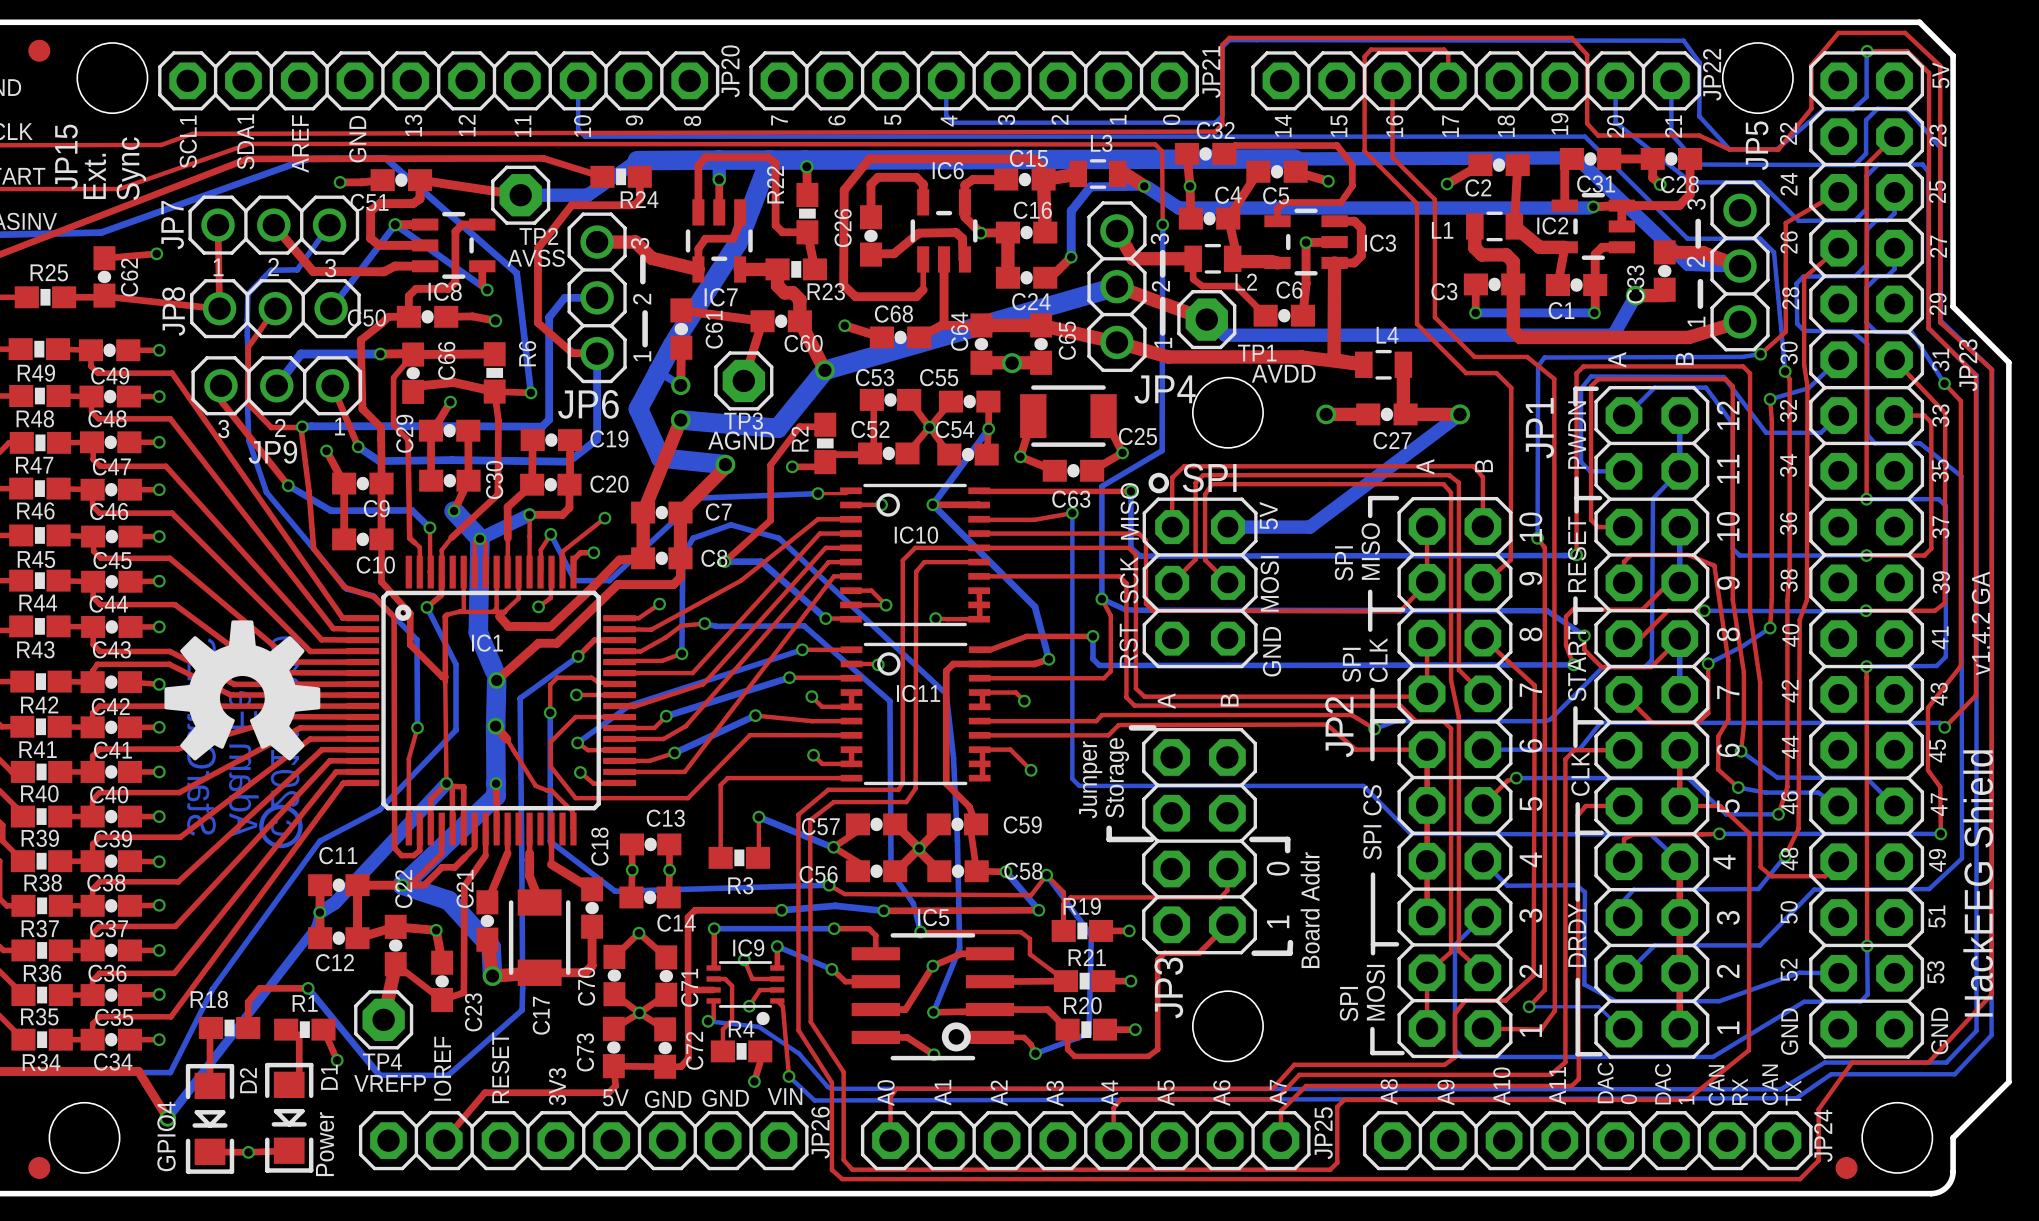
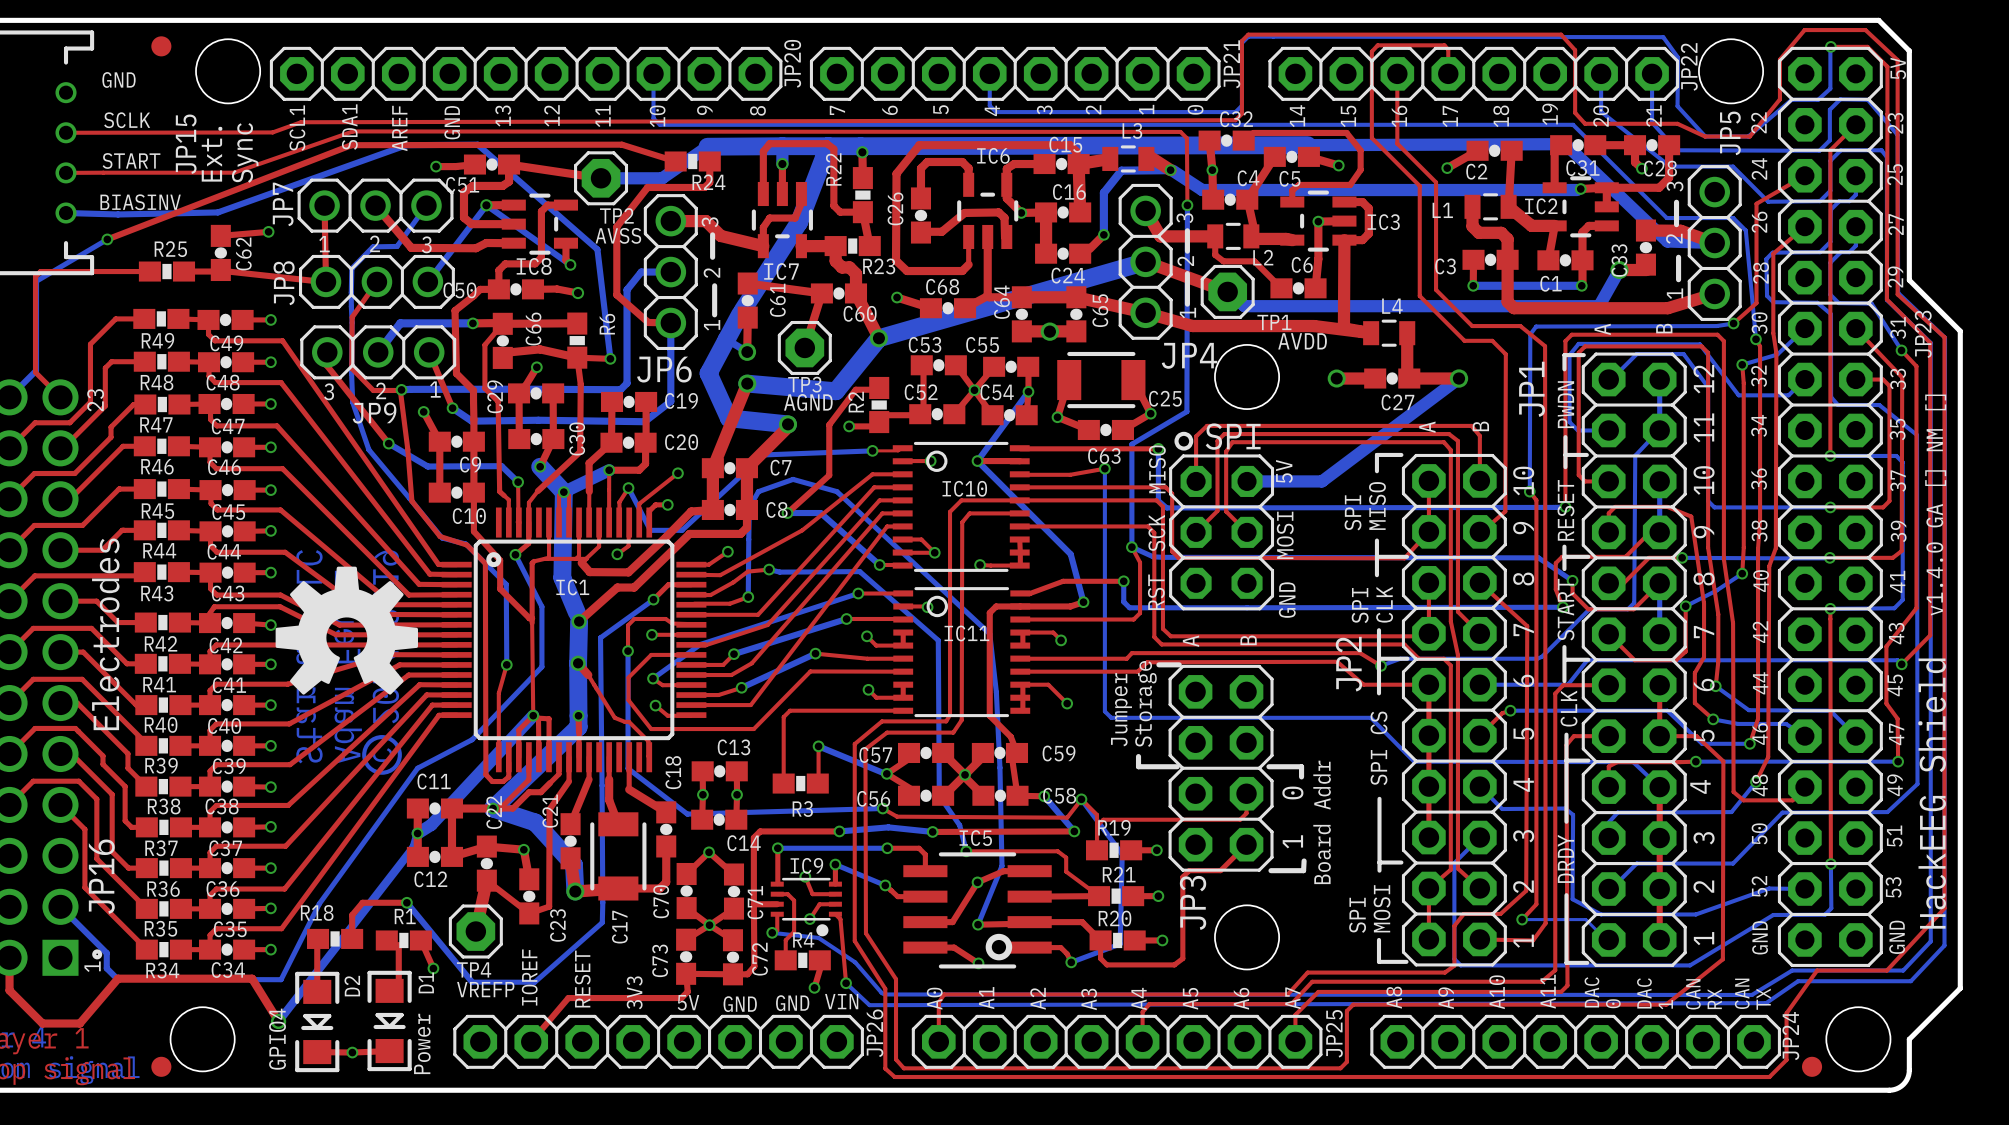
text: v1.4.2 GA (1980, 623) -> v1.4.0 GA [] NM [] (1935, 505)

